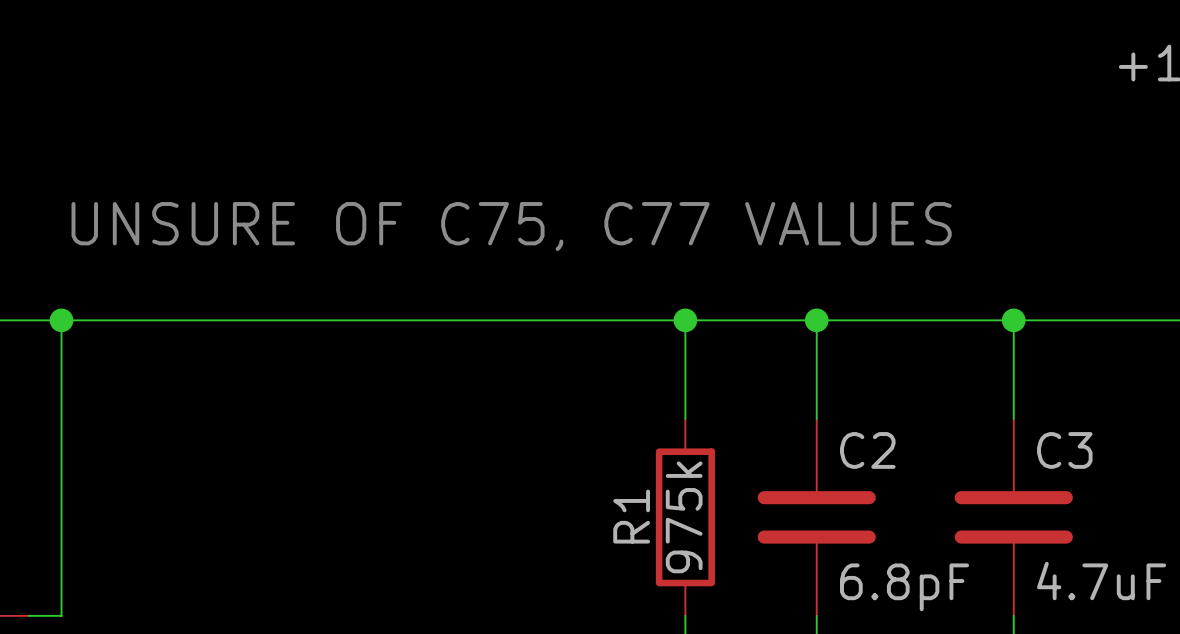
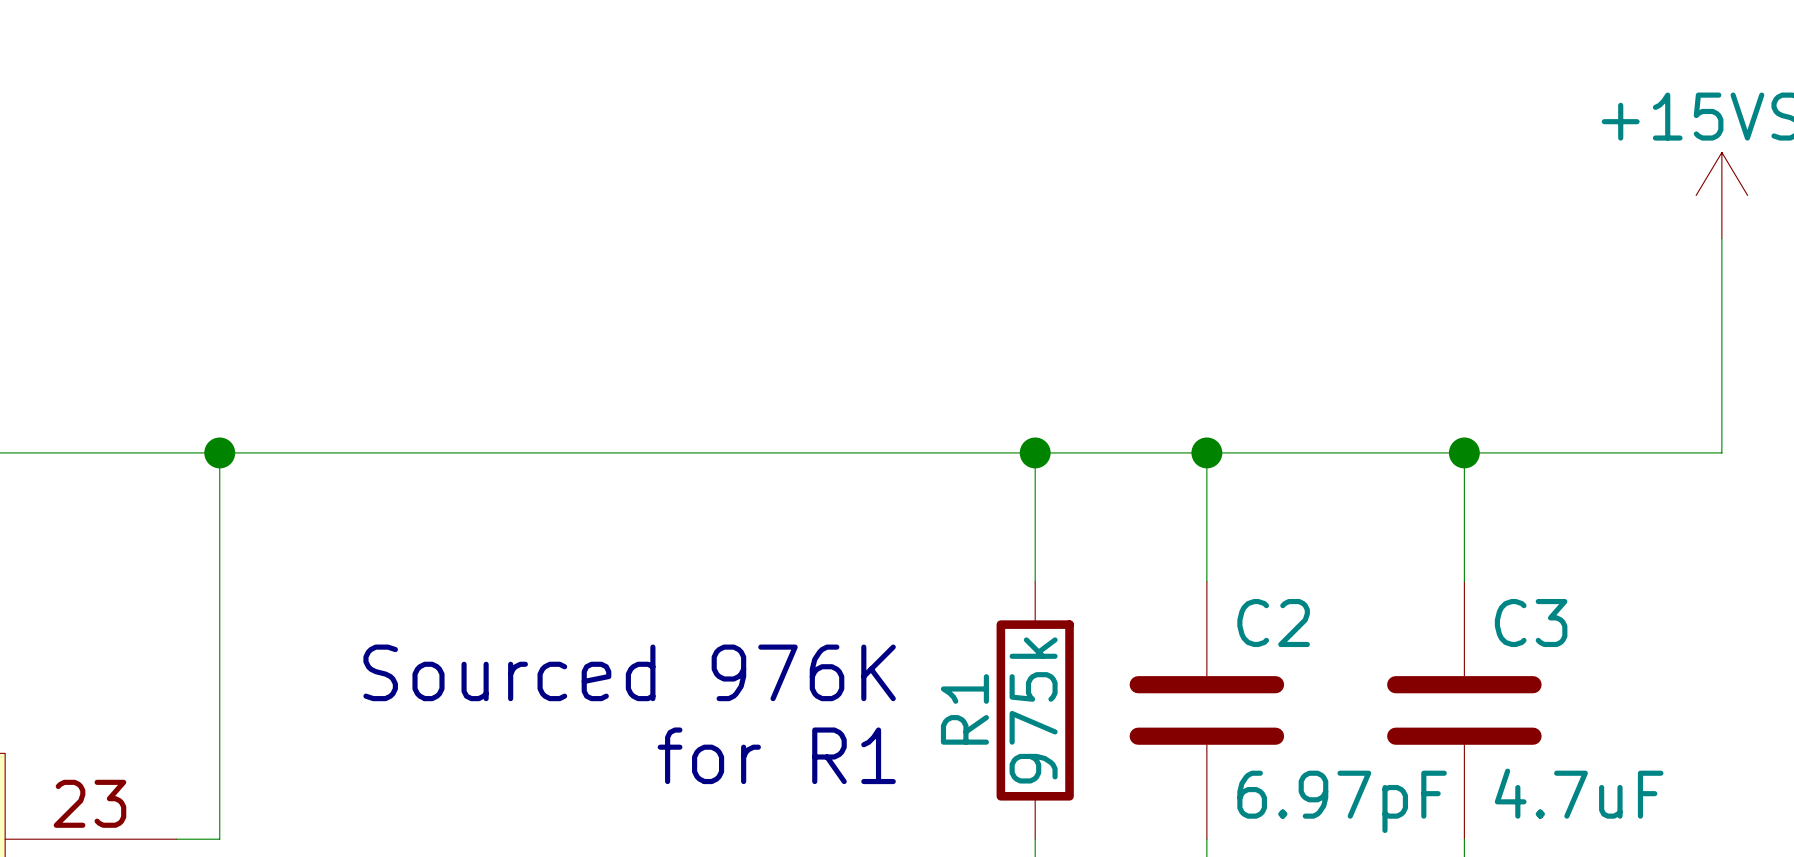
text: UNSURE OF C75, C77 VALUES (511, 226) -> none
text: none -> Sourced 976K (629, 672)
text: none -> for R1 (776, 755)
C2 value: 6.8pF (904, 587) -> 6.97pF (1342, 801)

